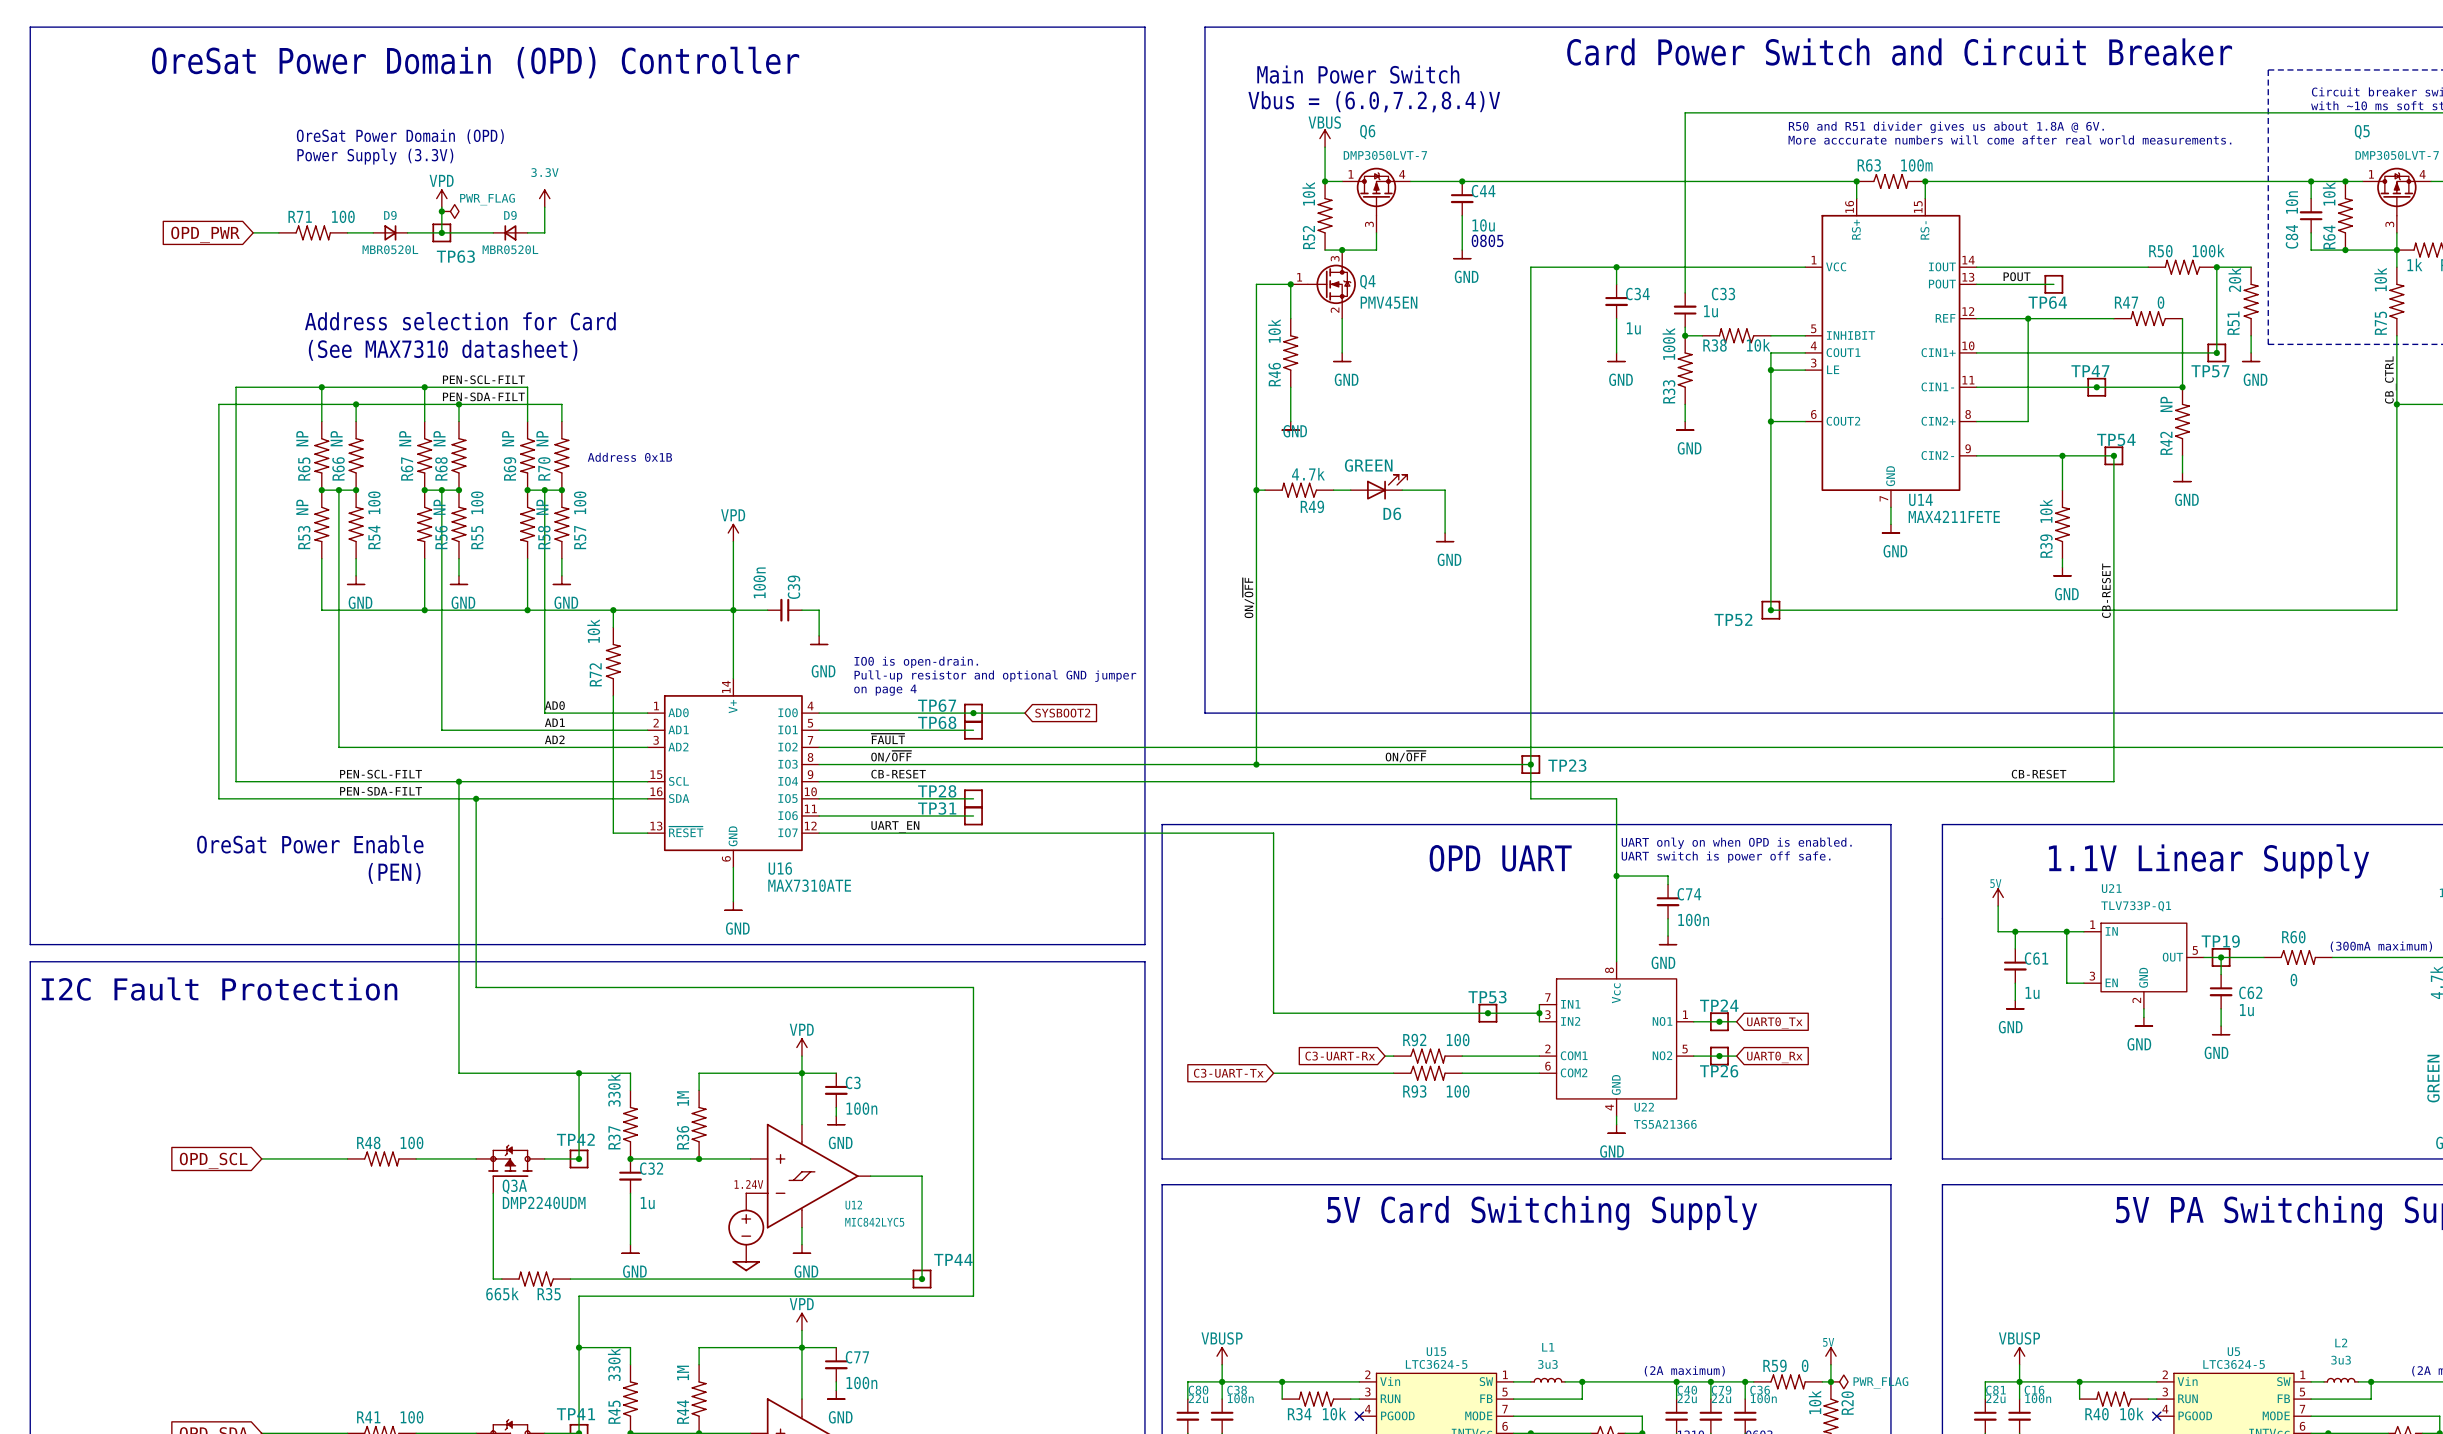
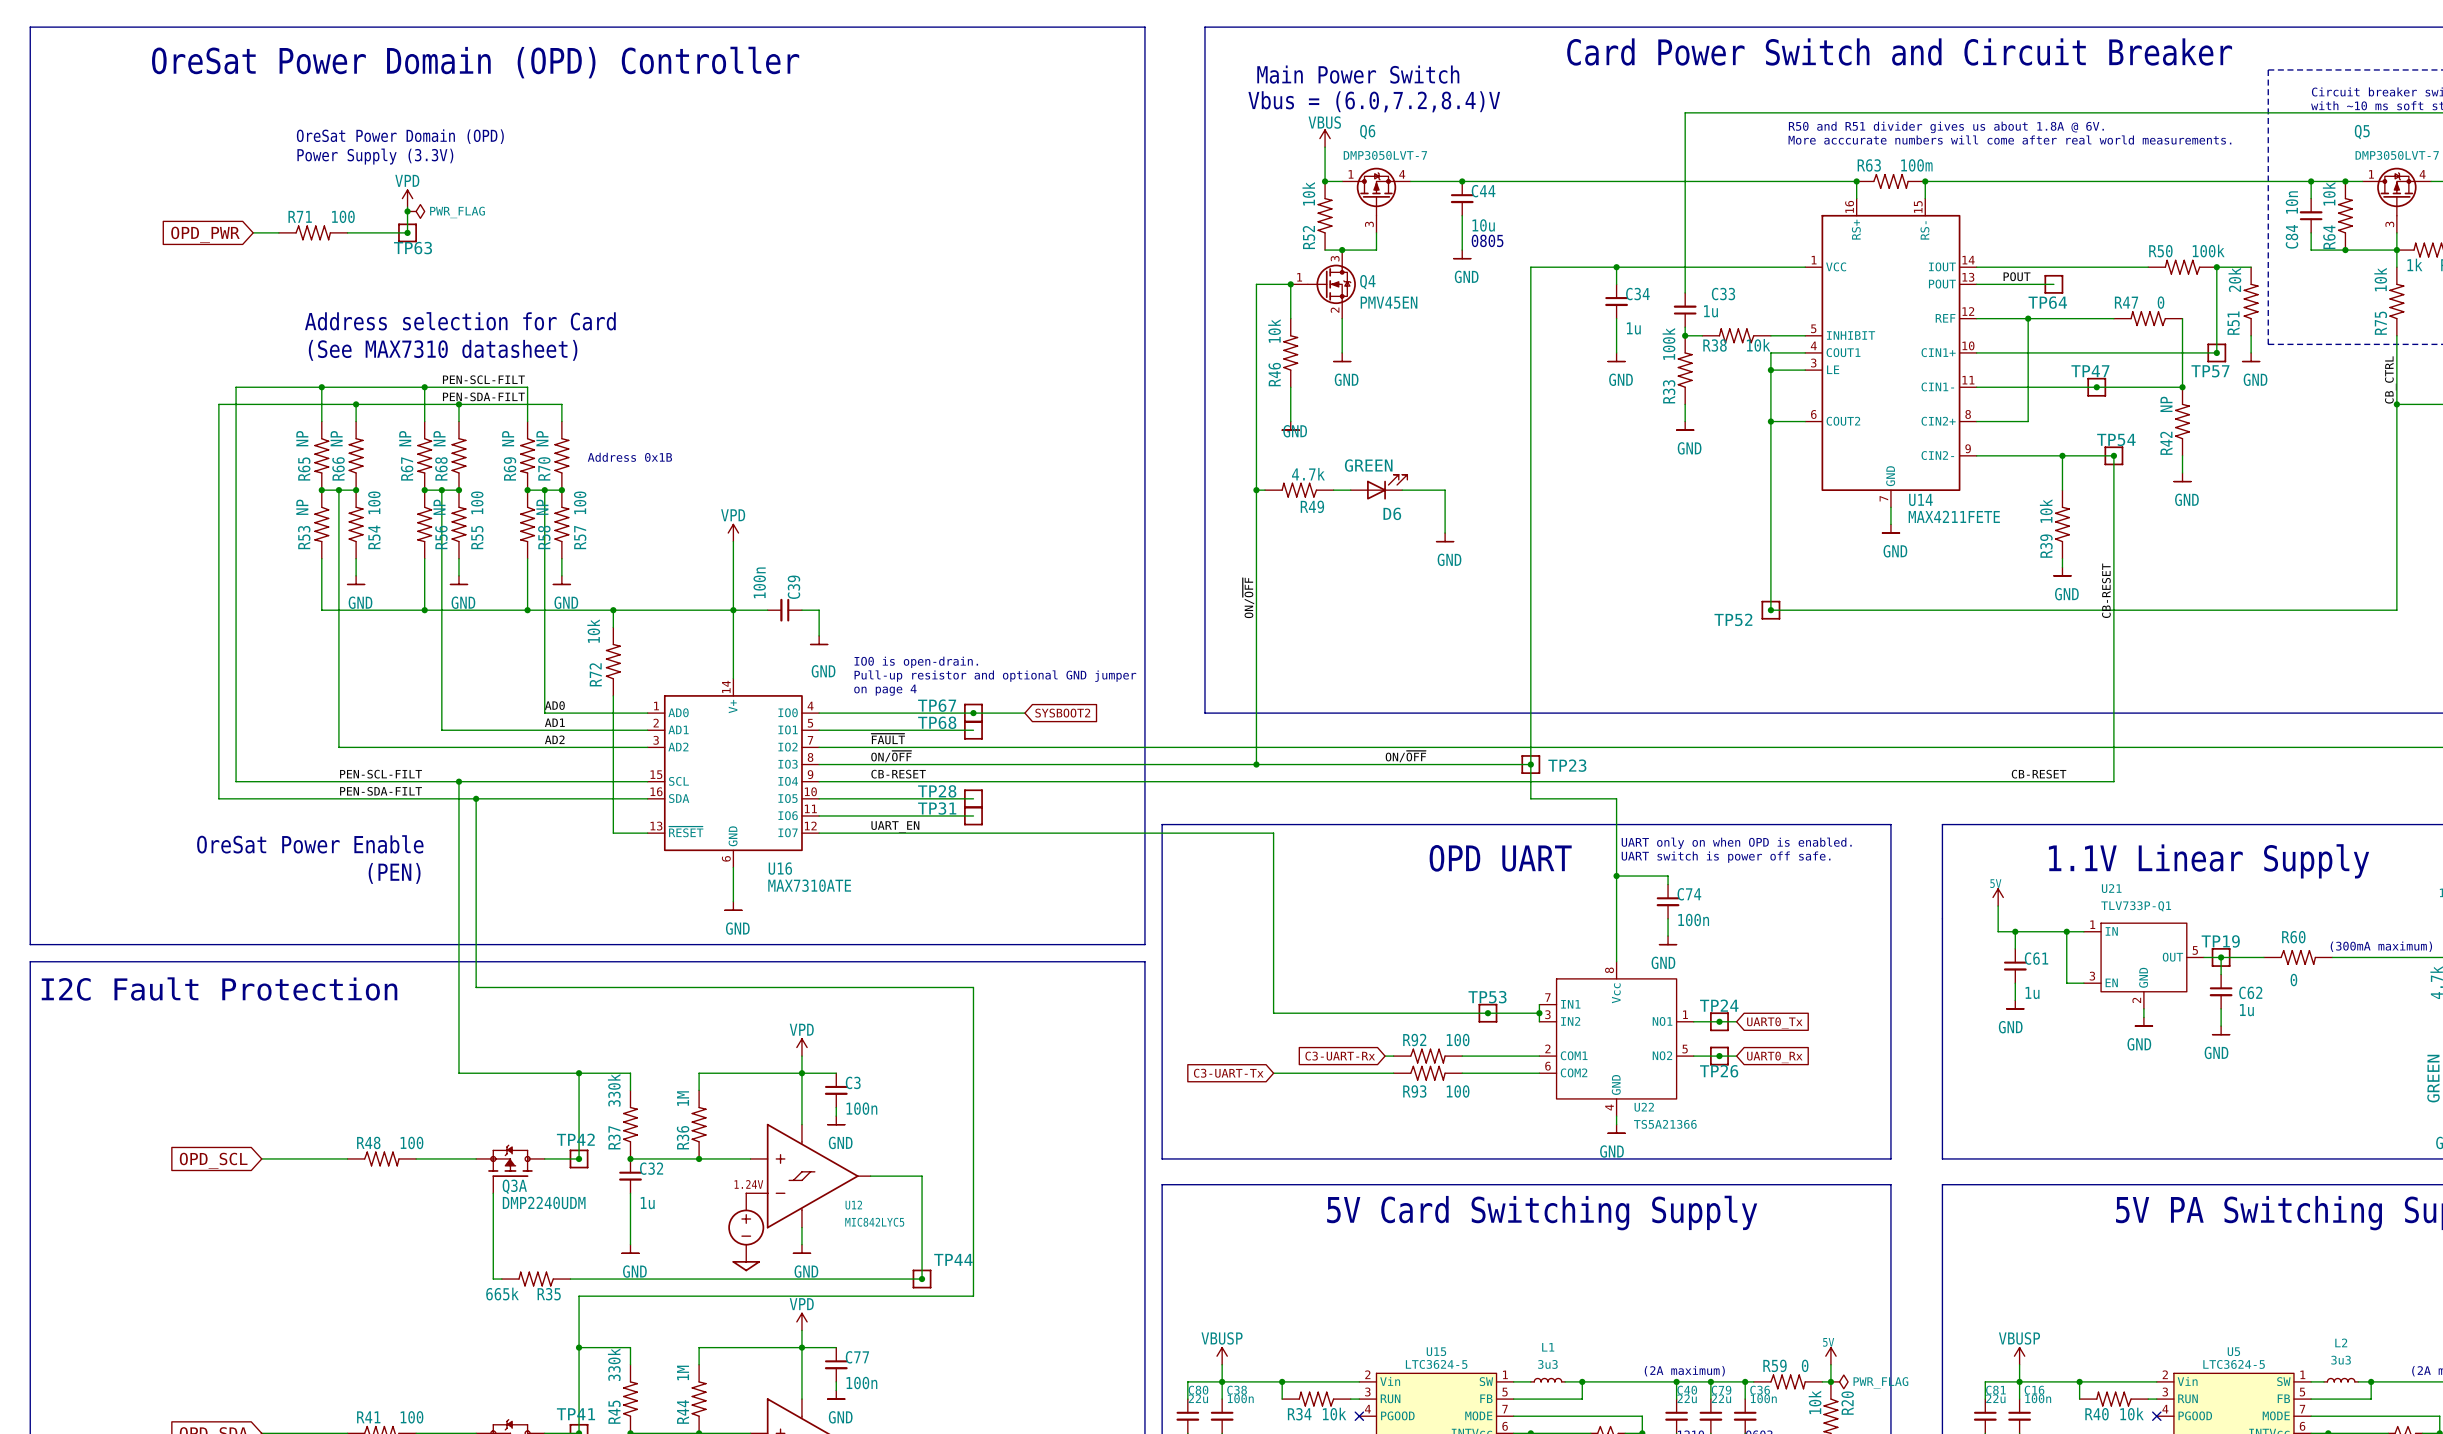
power symbol position: VPD (441, 198) -> VPD (407, 198)
power symbol: 3.3V (544, 198) -> none
power symbol text position: PWR_FLAG (487, 199) -> PWR_FLAG (457, 212)
wire: none -> (407, 207) (407, 232) (373, 232)
wire: (441, 207) (441, 232) -> none
wire: (544, 207) (544, 232) (527, 232) -> none
junction: none -> (407, 211)
junction: (441, 211) -> none
power symbol position: PWR_FLAG (450, 211) -> PWR_FLAG (416, 211)
D9: MBR0520L (390, 232) -> none
wire: (407, 232) (493, 232) -> none
junction: none -> (407, 232)
junction: (441, 232) -> none
TP63 position: (441, 232) -> (407, 232)
D9: MBR0520L (510, 232) -> none
TP63 name position: TP63 (455, 256) -> TP63 (413, 248)

